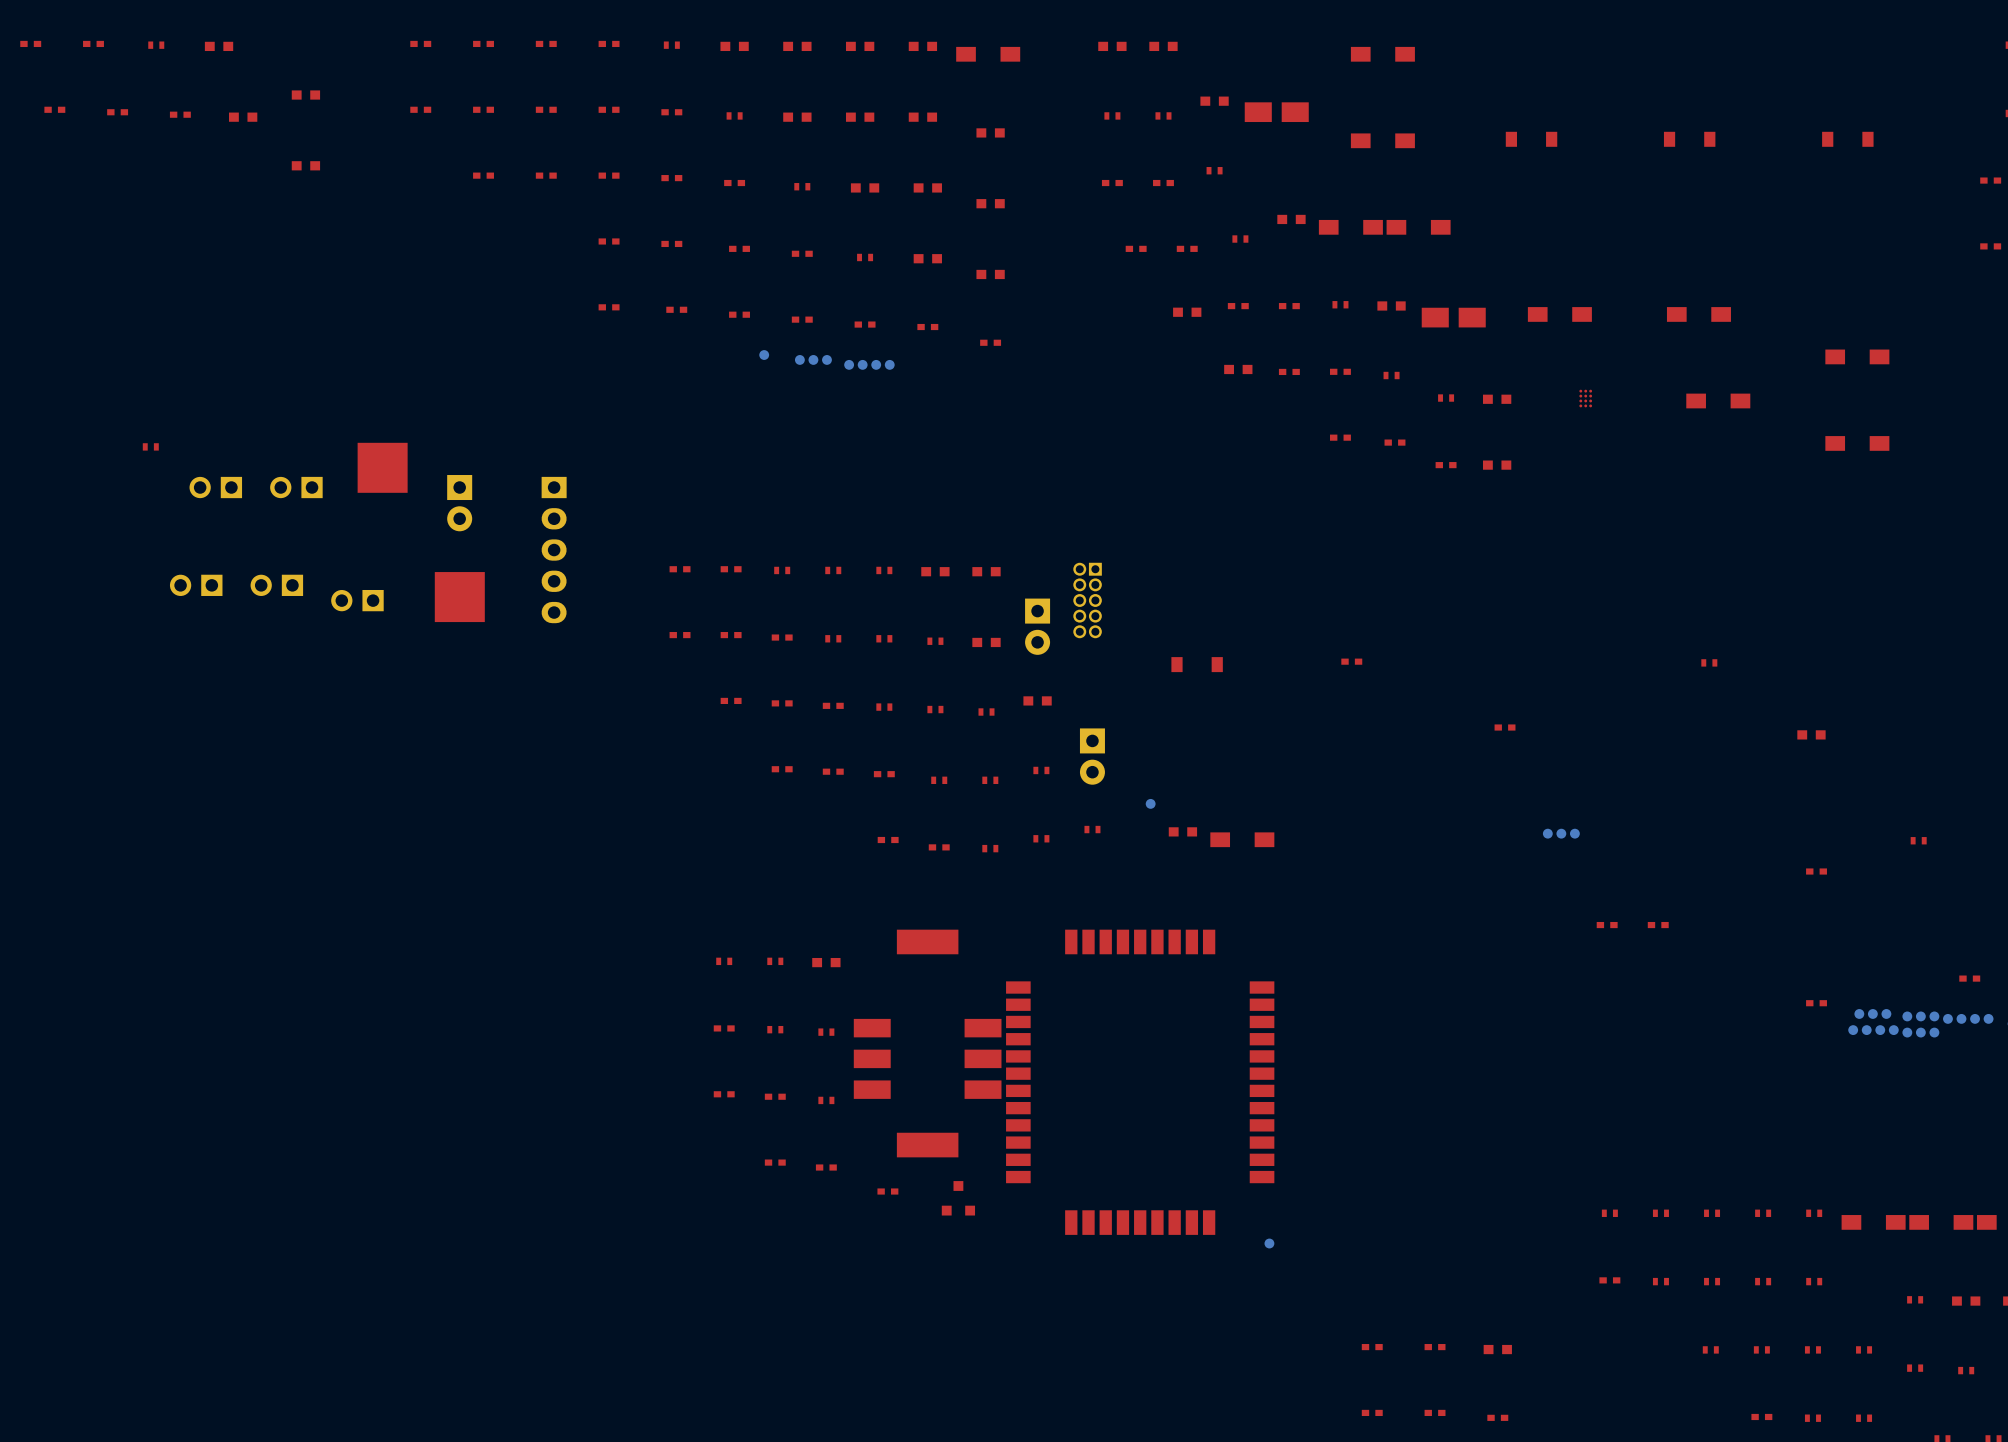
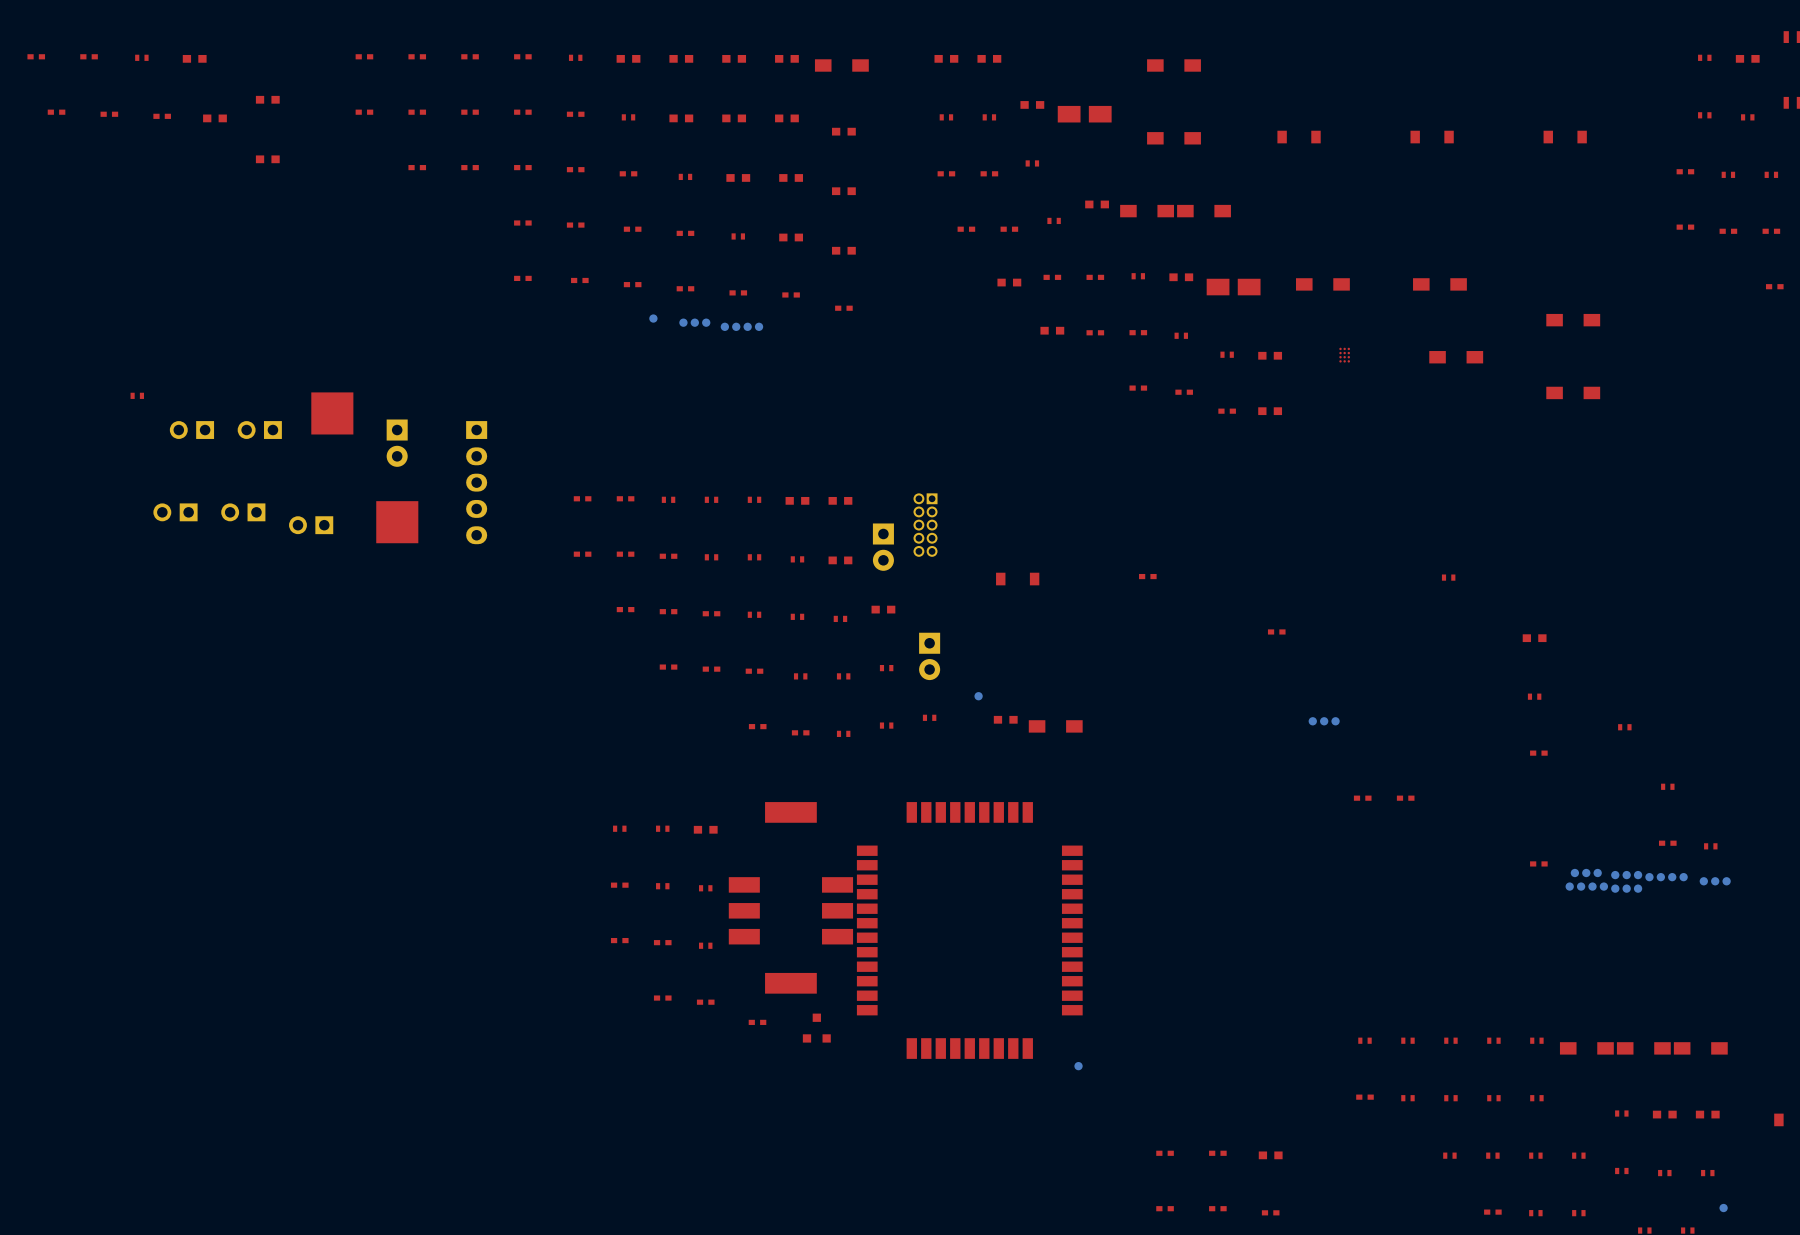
part: none -> (1534, 696)
part: none -> (1667, 786)

